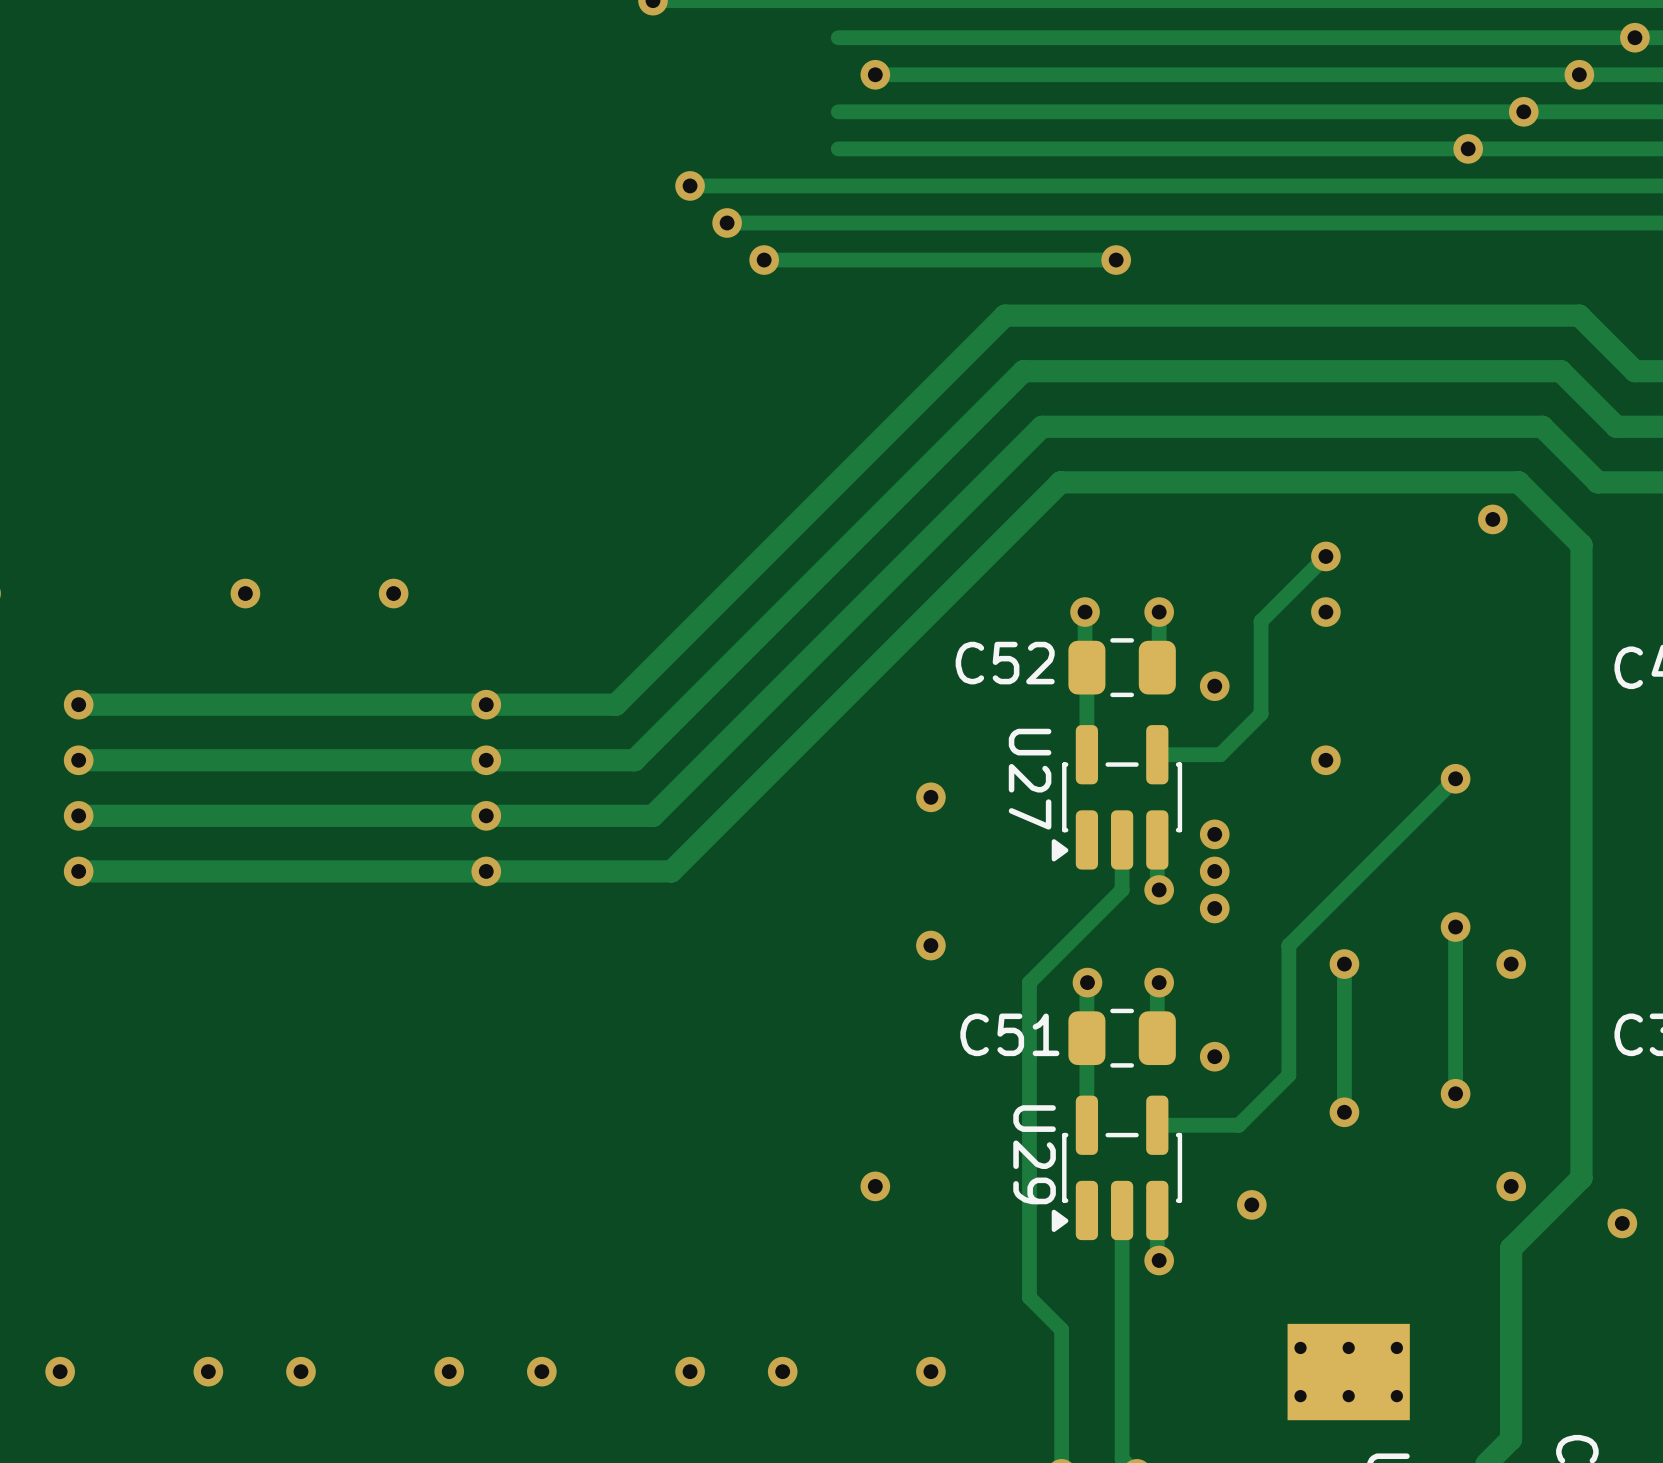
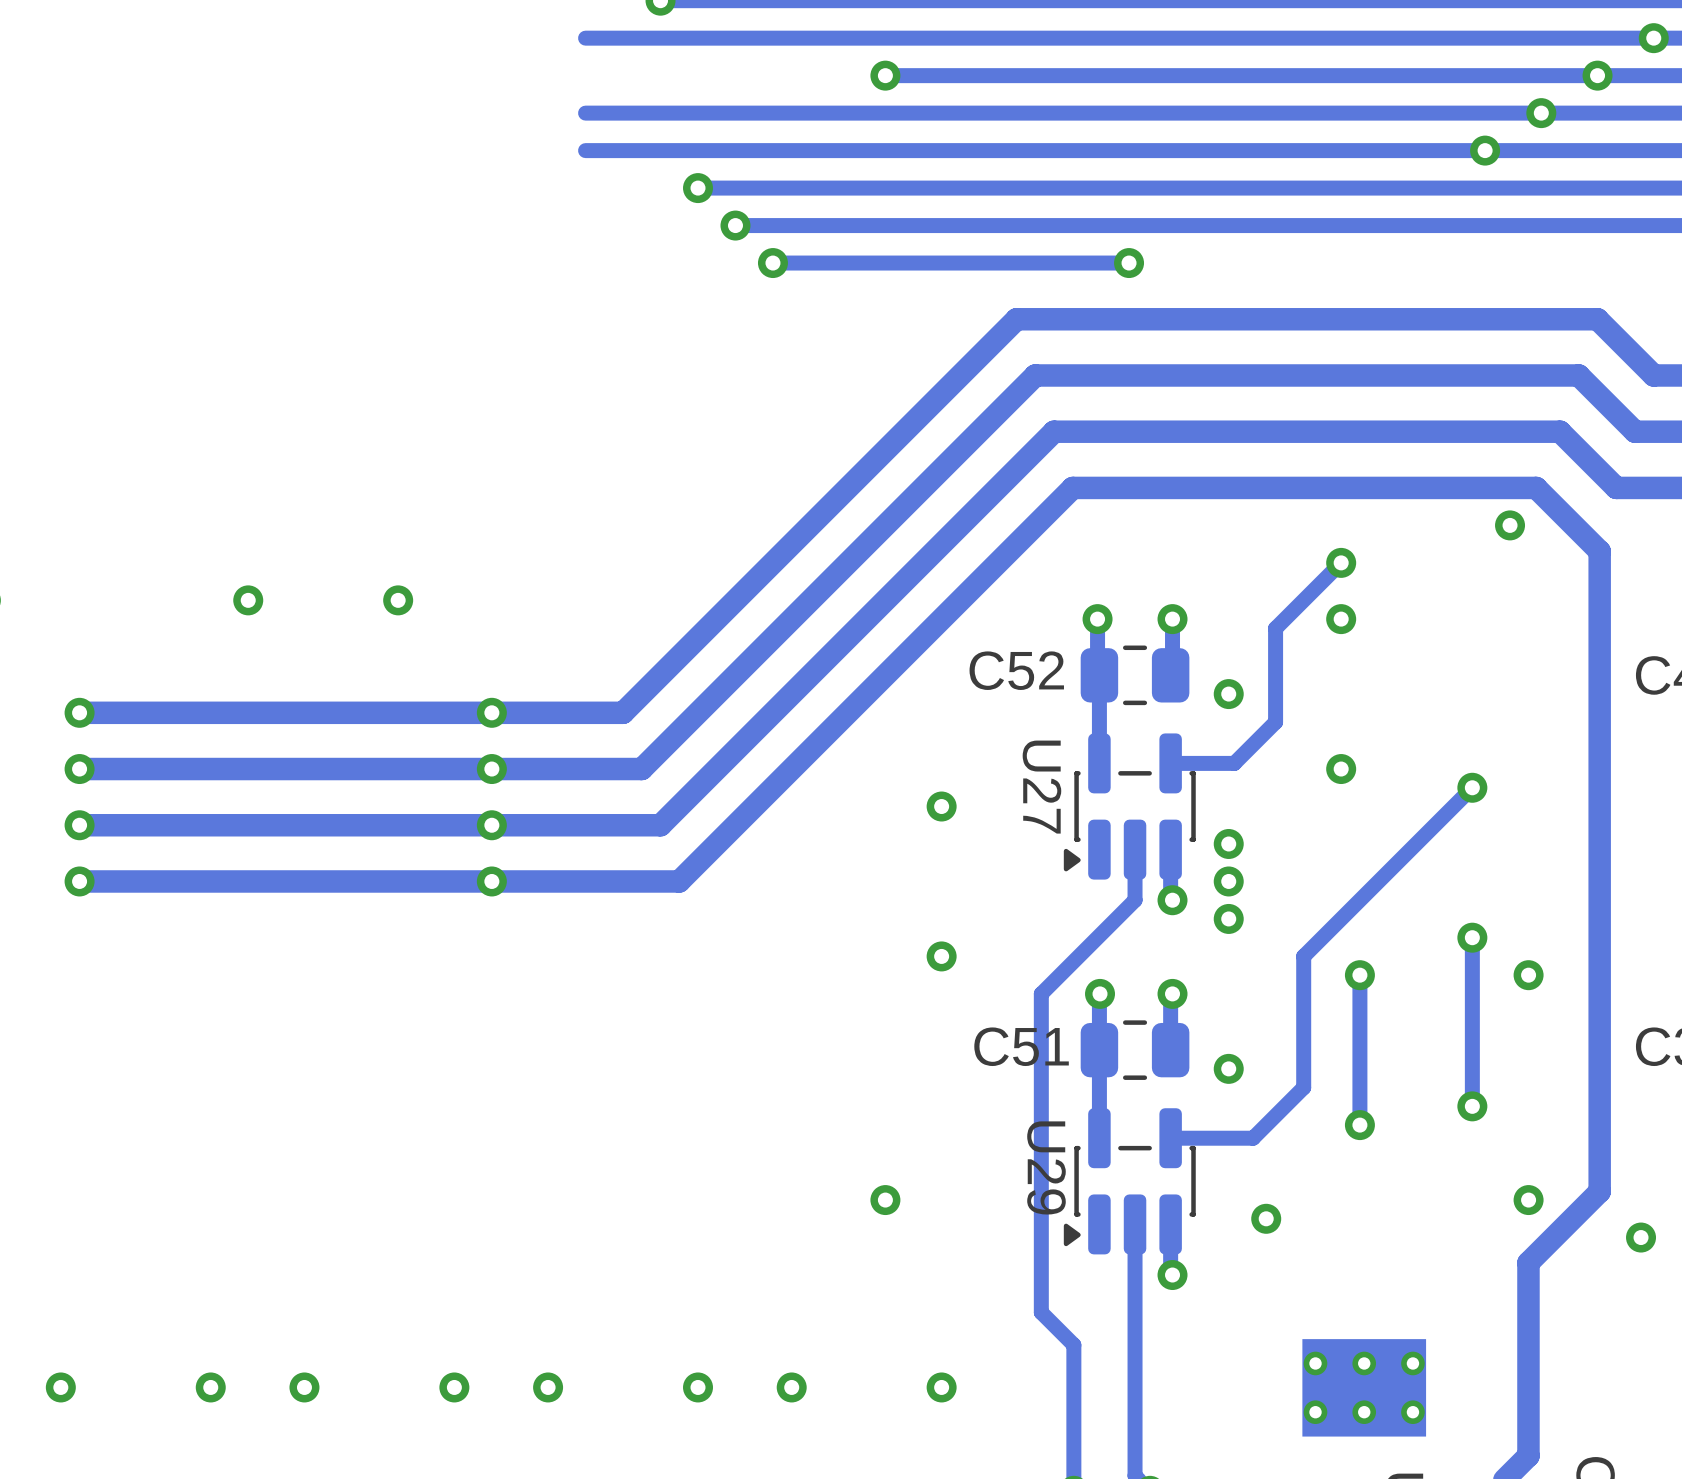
track: none -> (847, 38) (585, 38)
track: none -> (847, 113) (585, 113)
track: none -> (847, 150) (585, 150)

